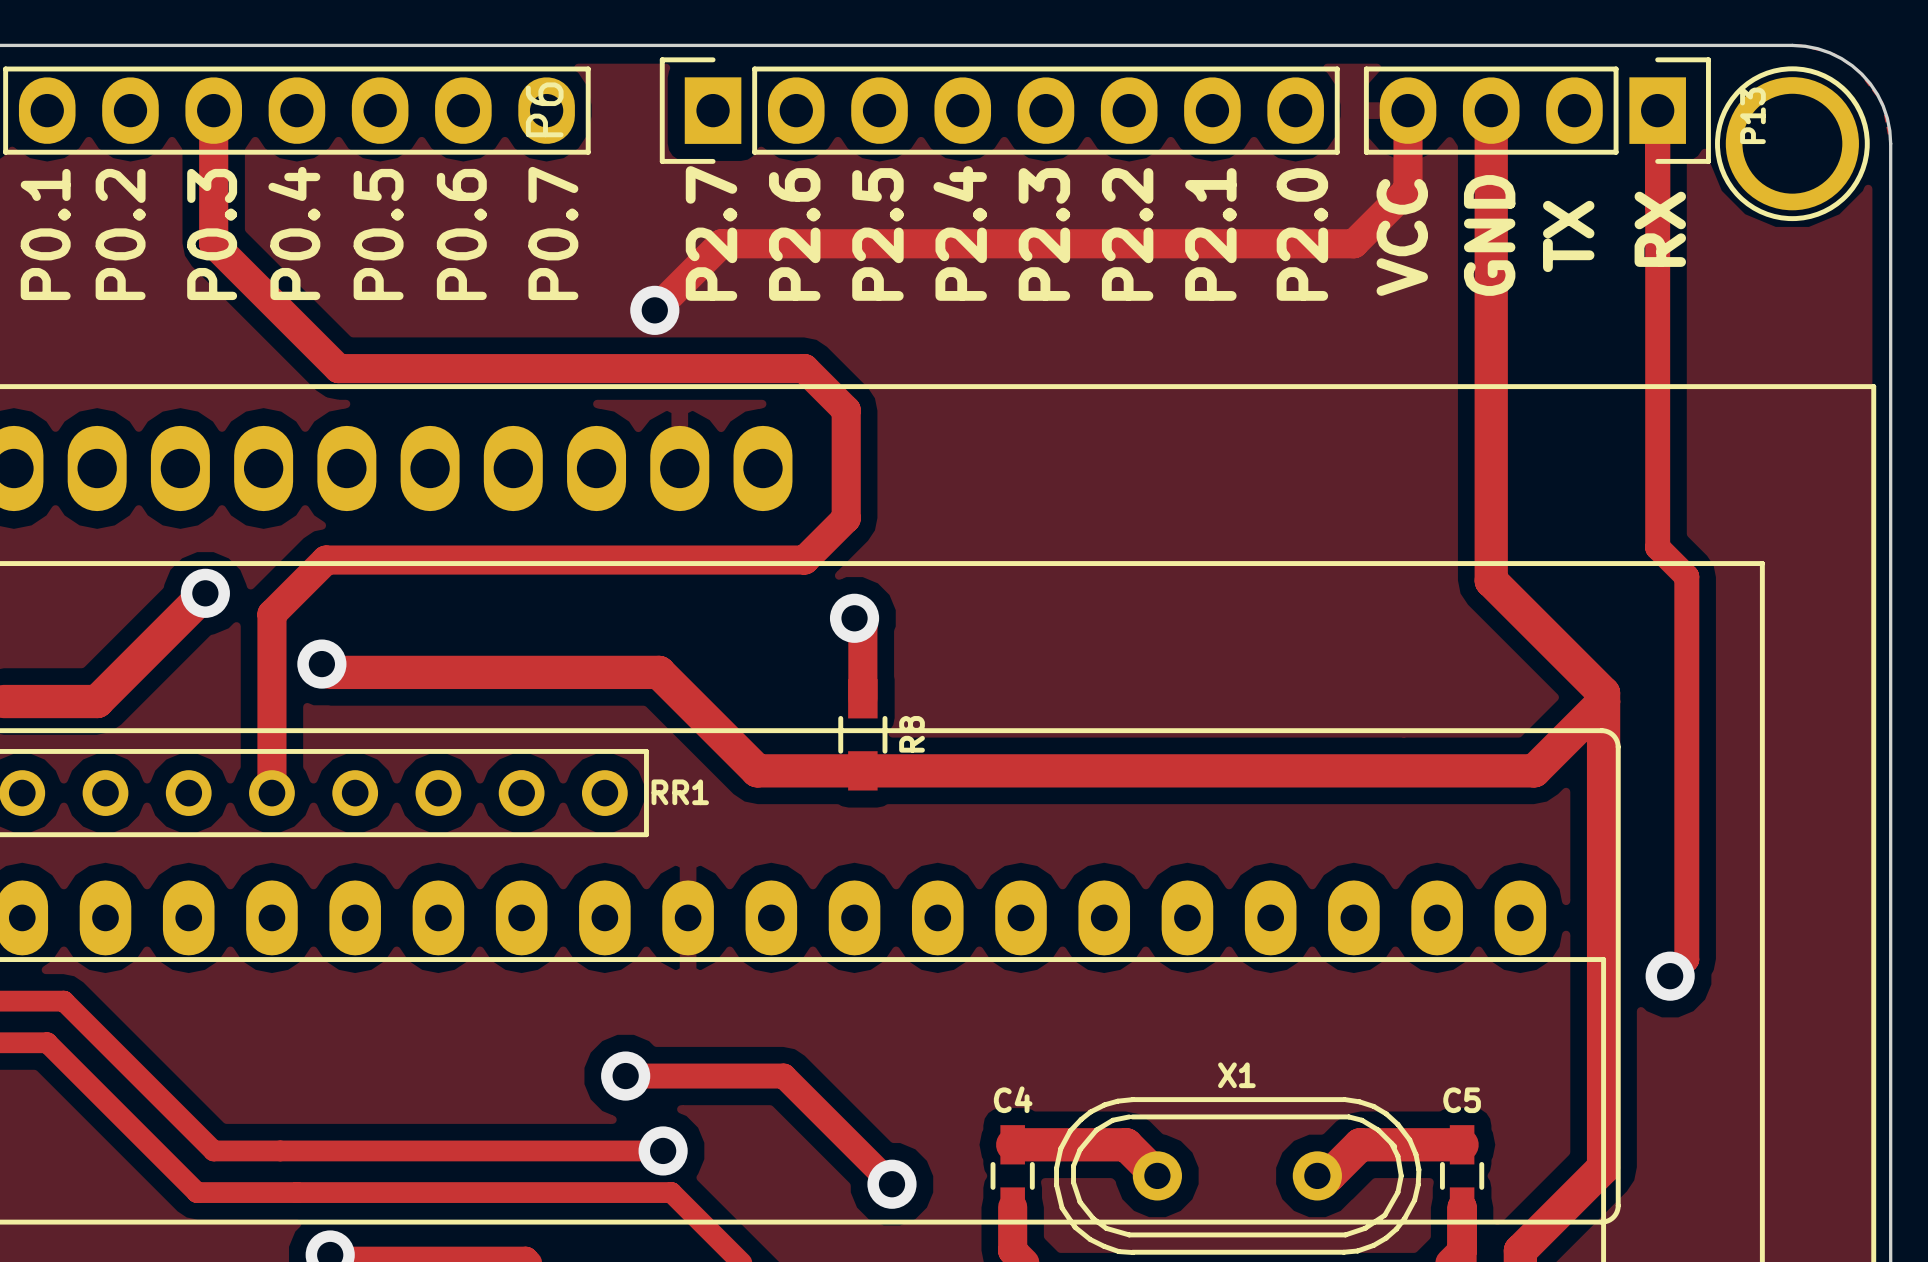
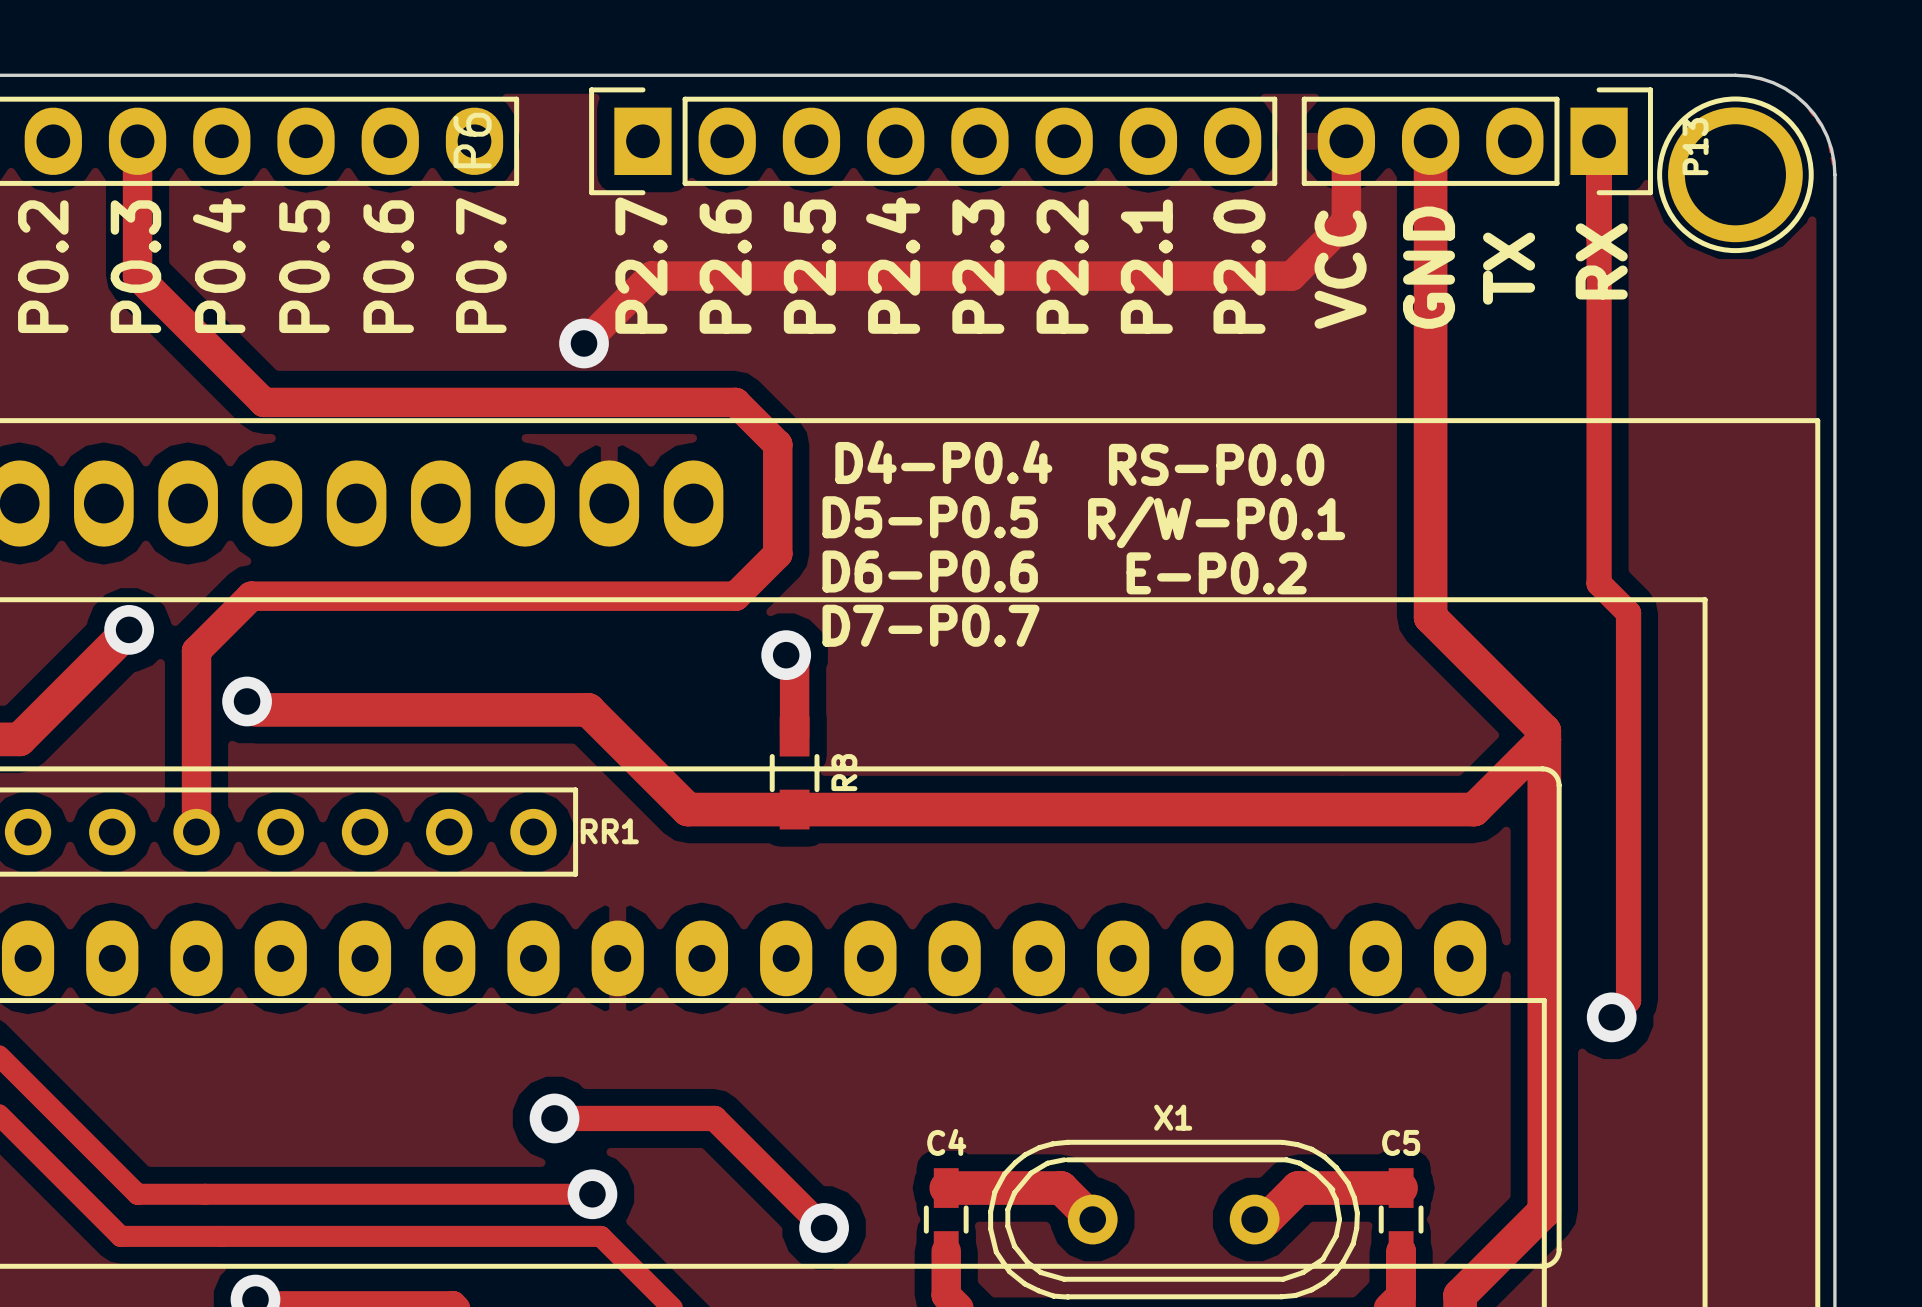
text: none -> D4-P0.4 (943, 462)
text: none -> RS-P0.0 (1216, 464)
text: none -> D5-P0.5 (930, 517)
text: none -> R/W-P0.1 (1216, 522)
text: none -> D6-P0.6 (930, 571)
text: none -> E-P0.2 (1216, 573)
text: none -> D7-P0.7 (930, 625)

